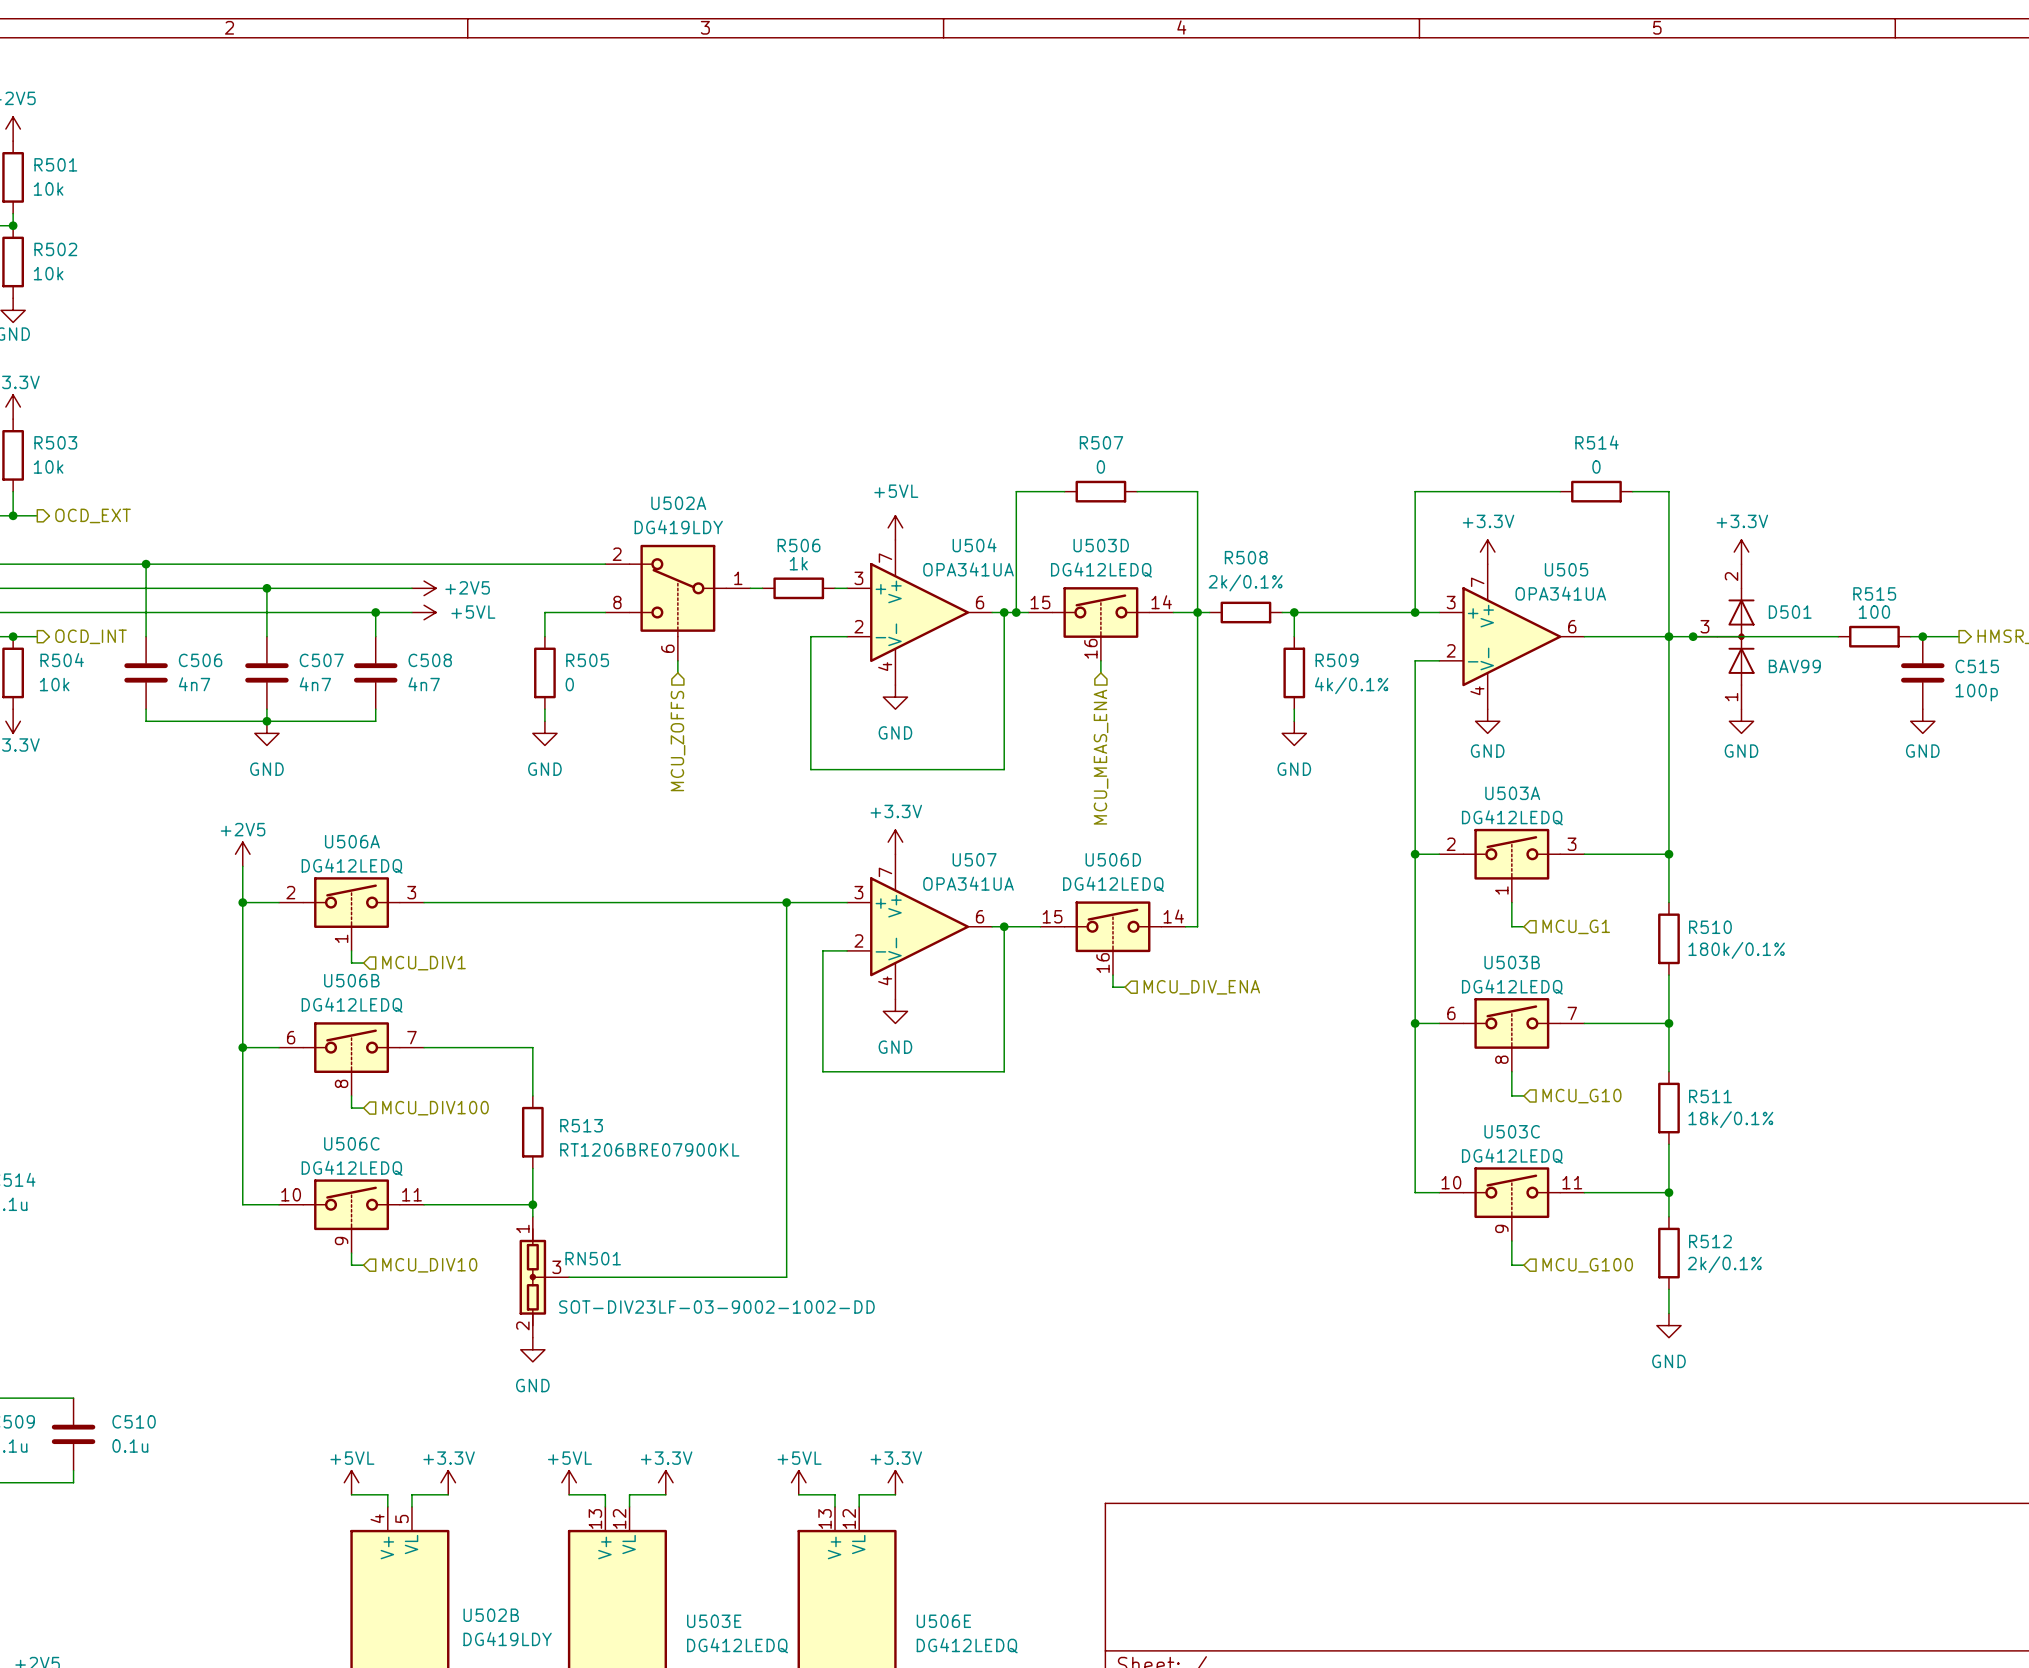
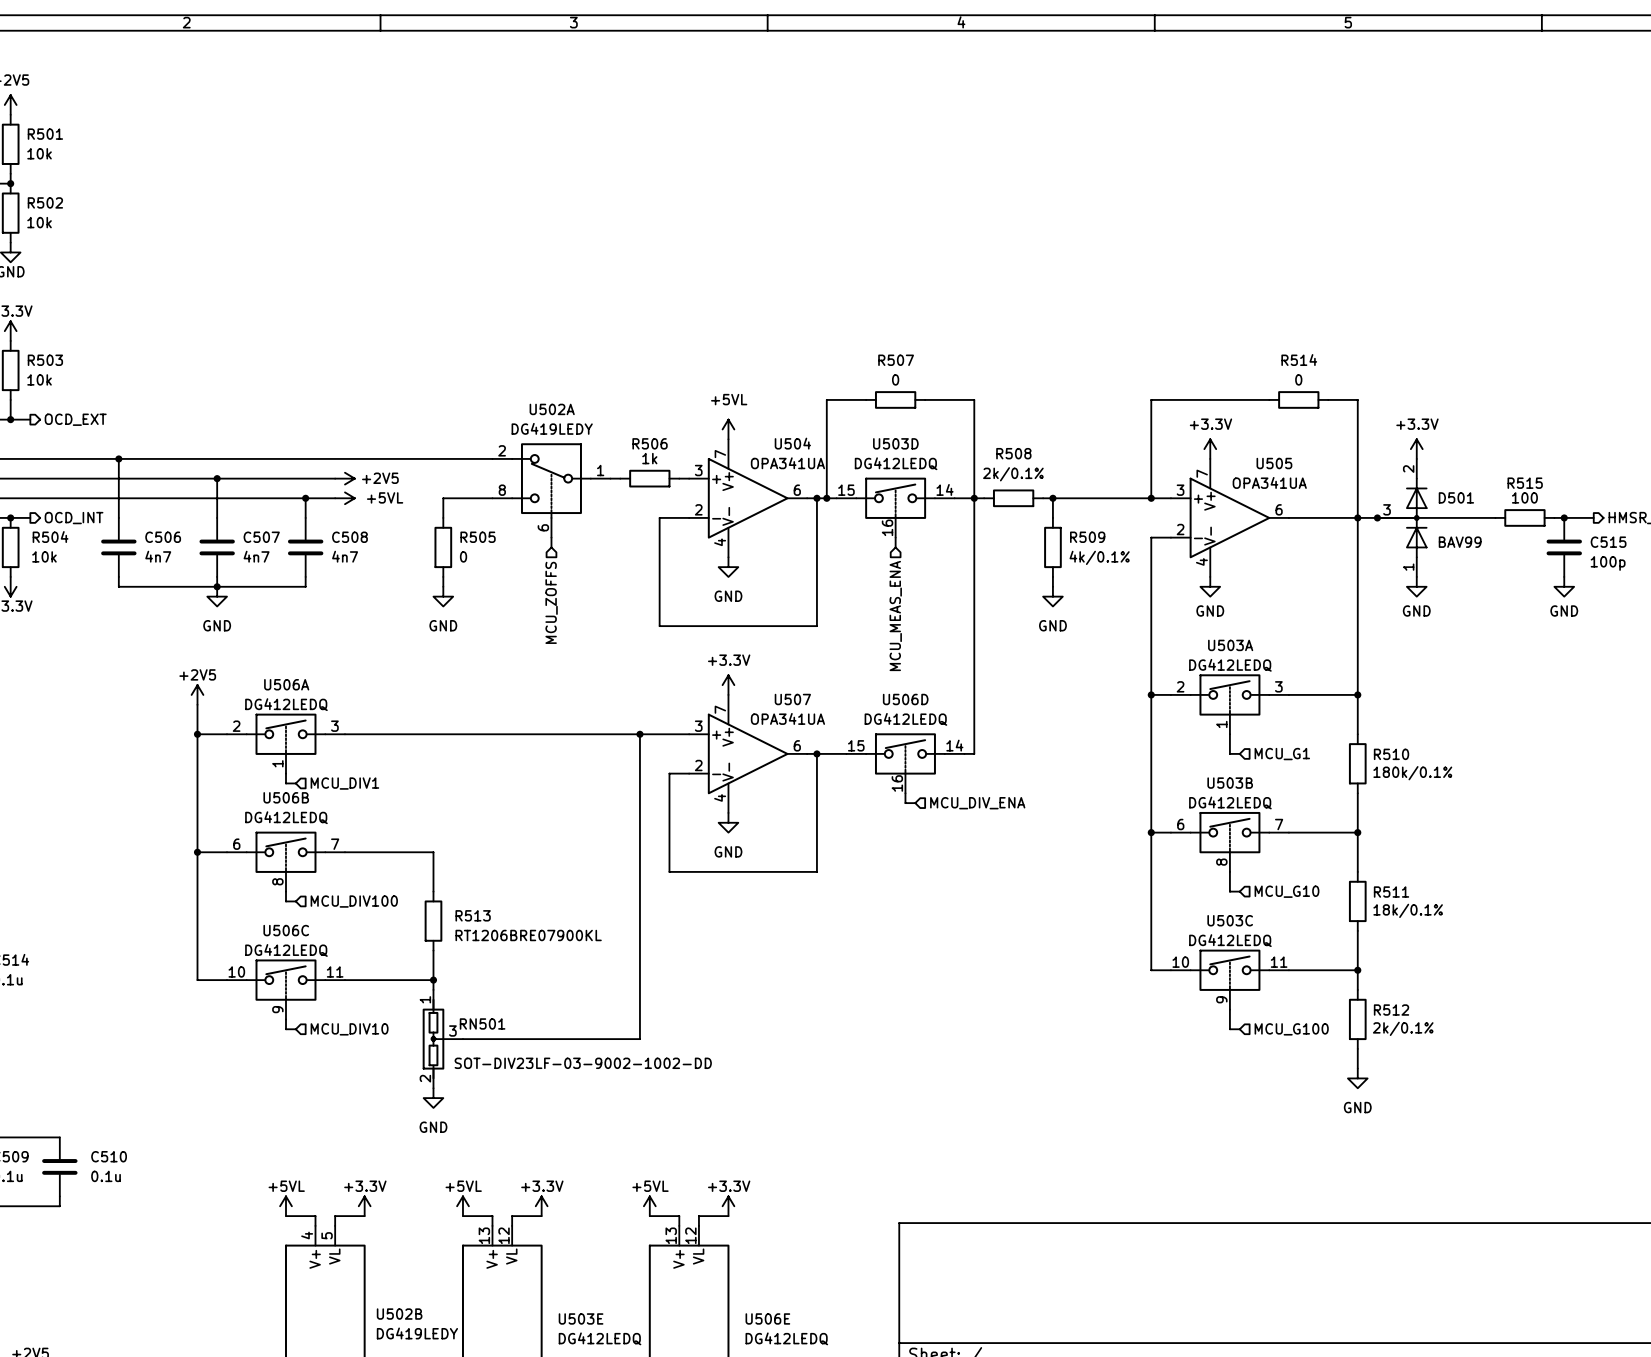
U502A value: DG419LDY (678, 527) -> DG419LEDY (552, 428)
U502B value: DG419LDY (507, 1639) -> DG419LEDY (417, 1333)

